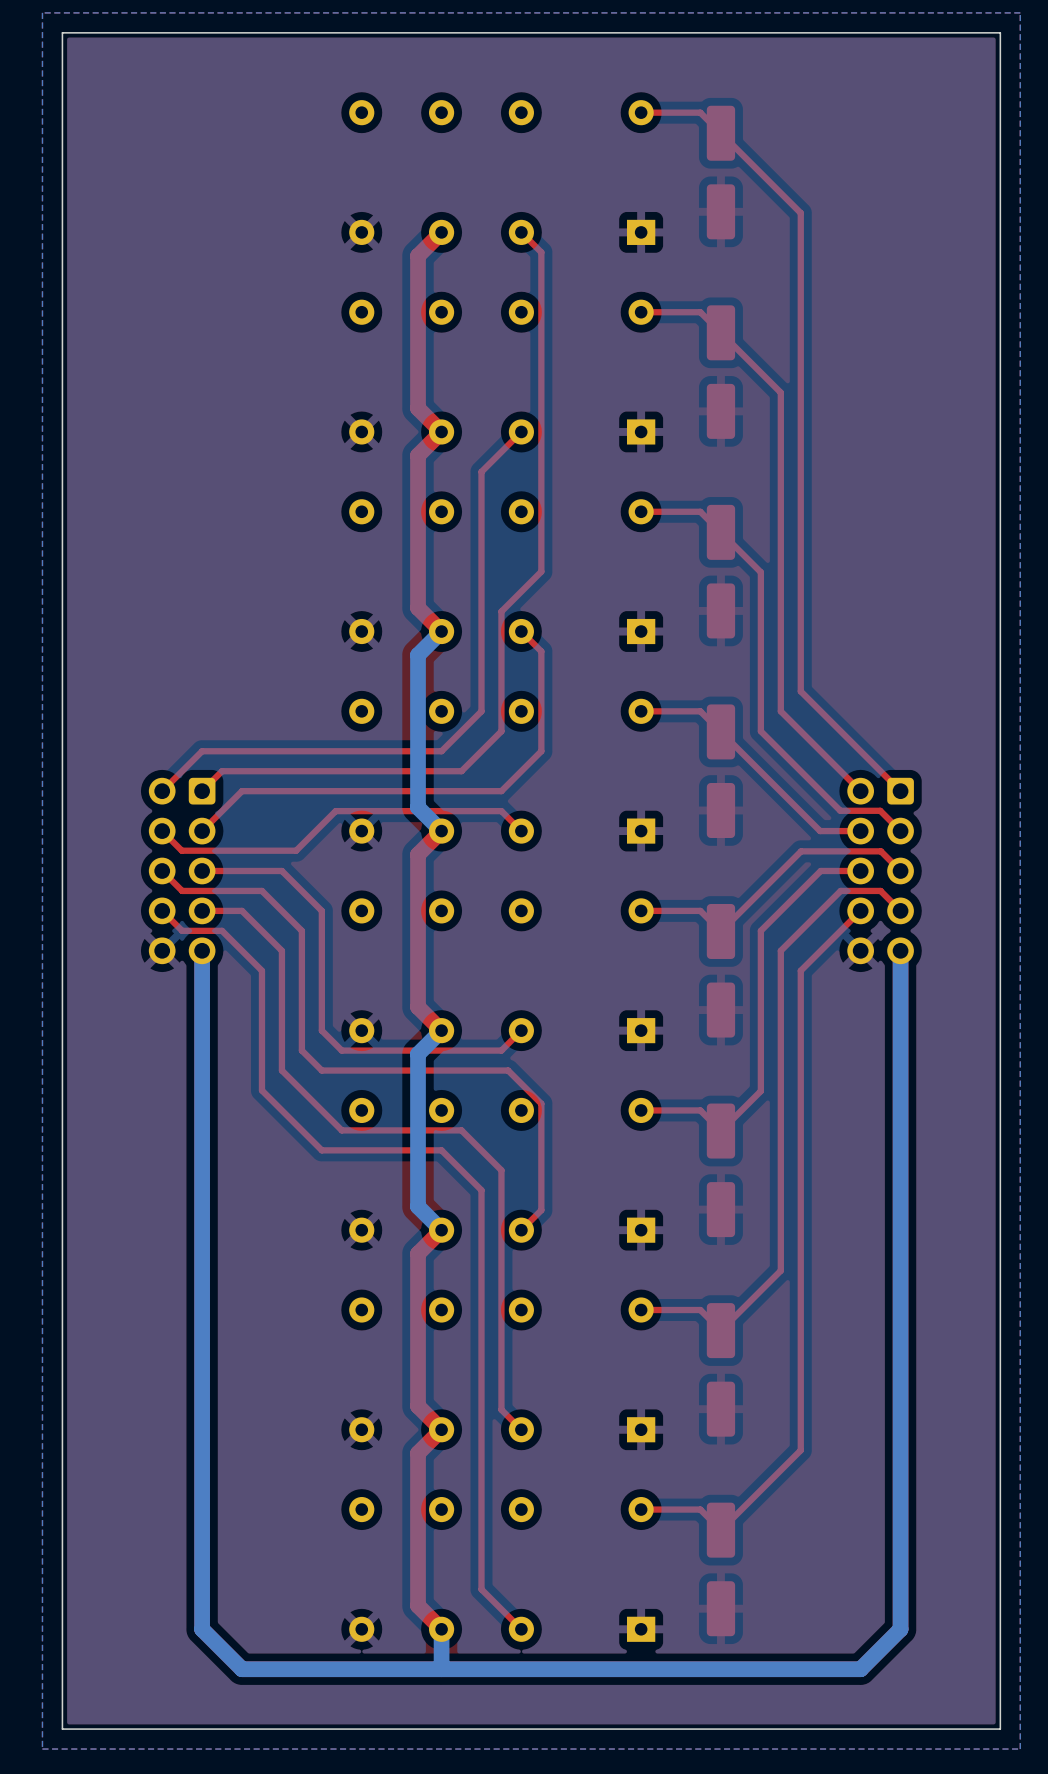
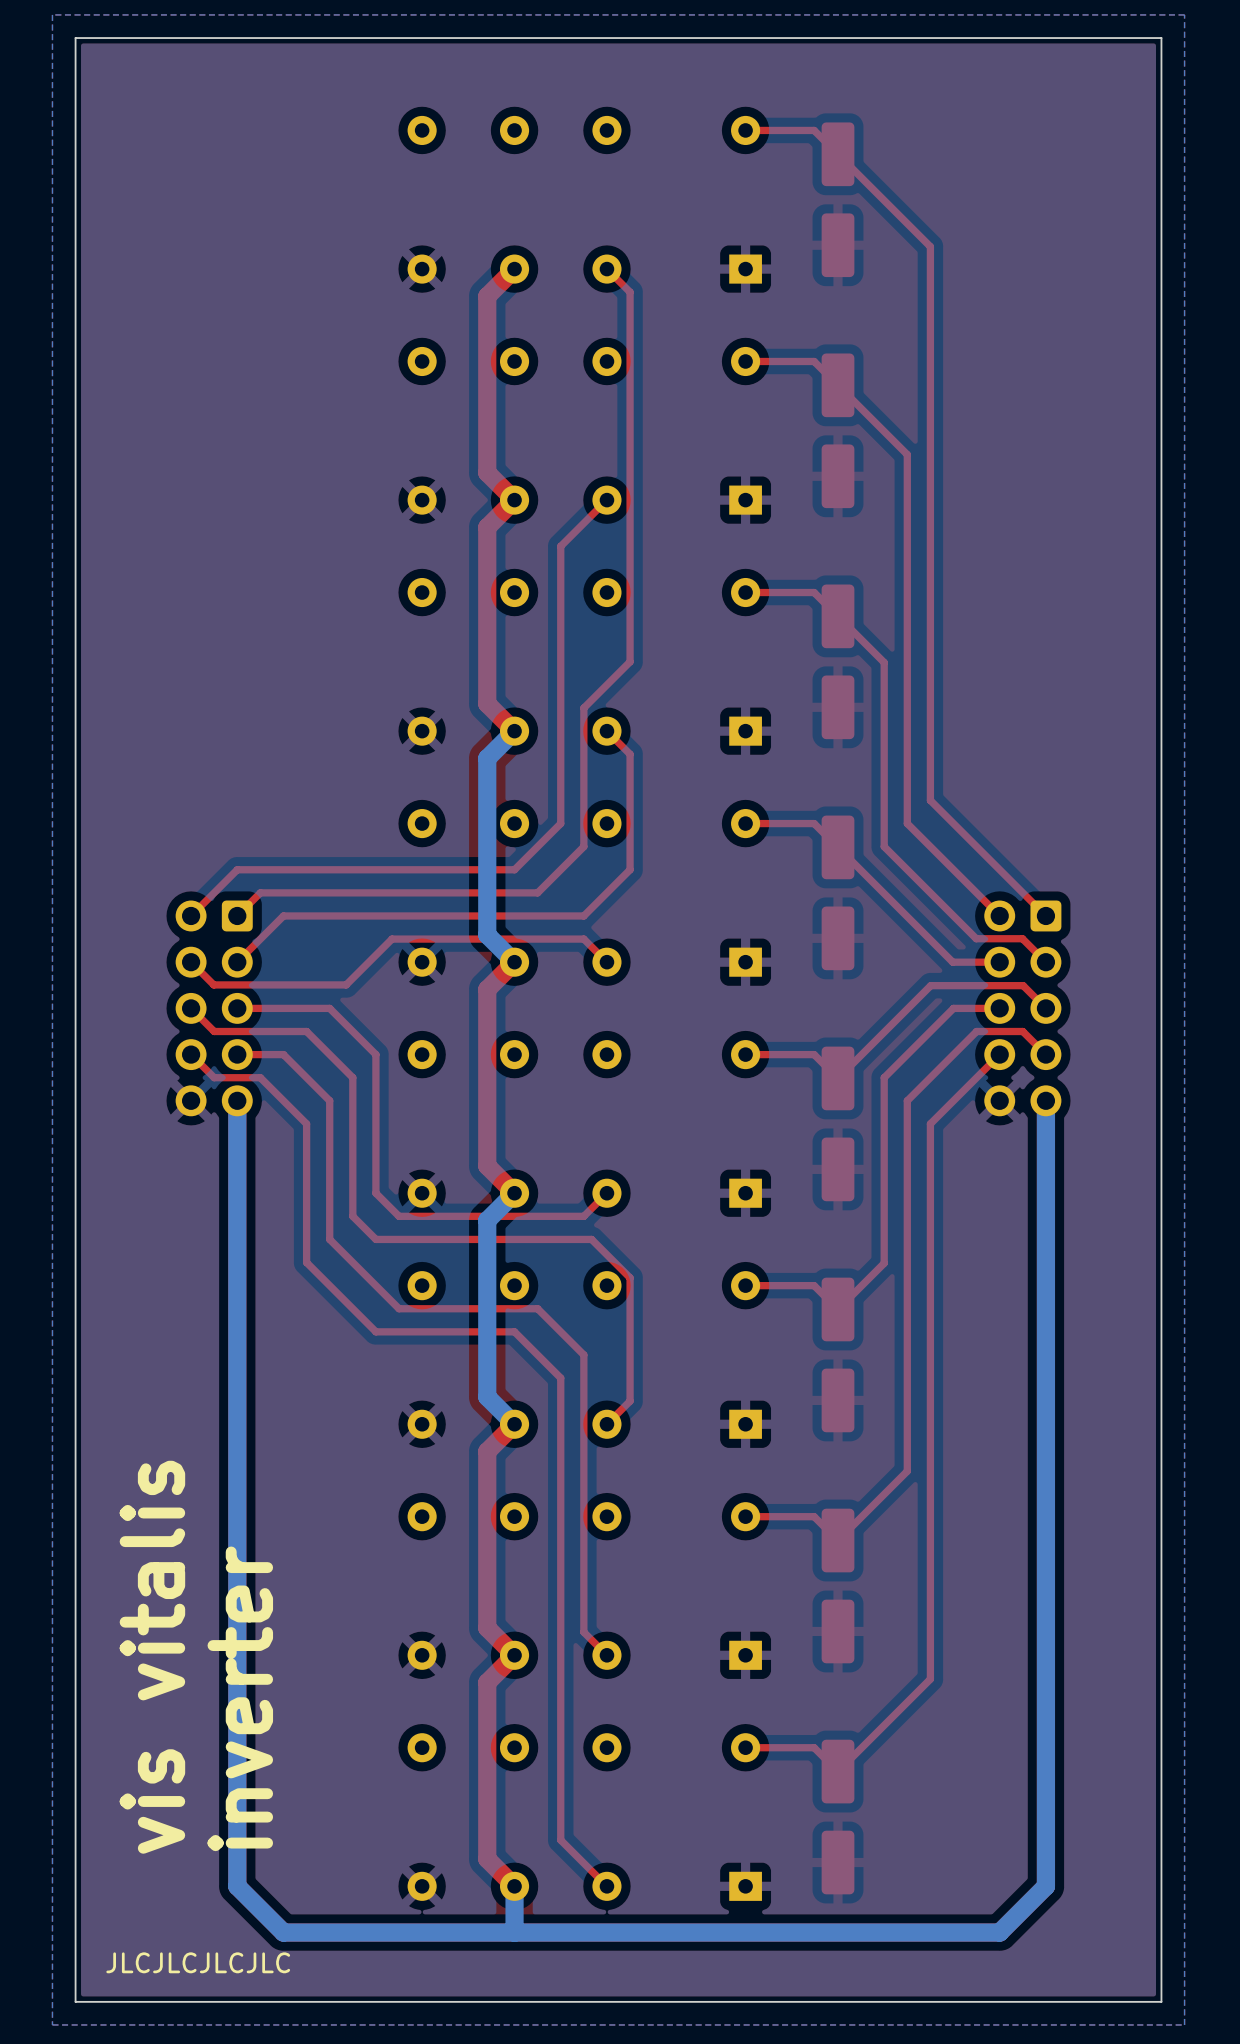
text: none -> vis vitalis (152, 1657)
text: none -> inverter (240, 1698)
text: none -> JLCJLCJLCJLC (198, 1962)

